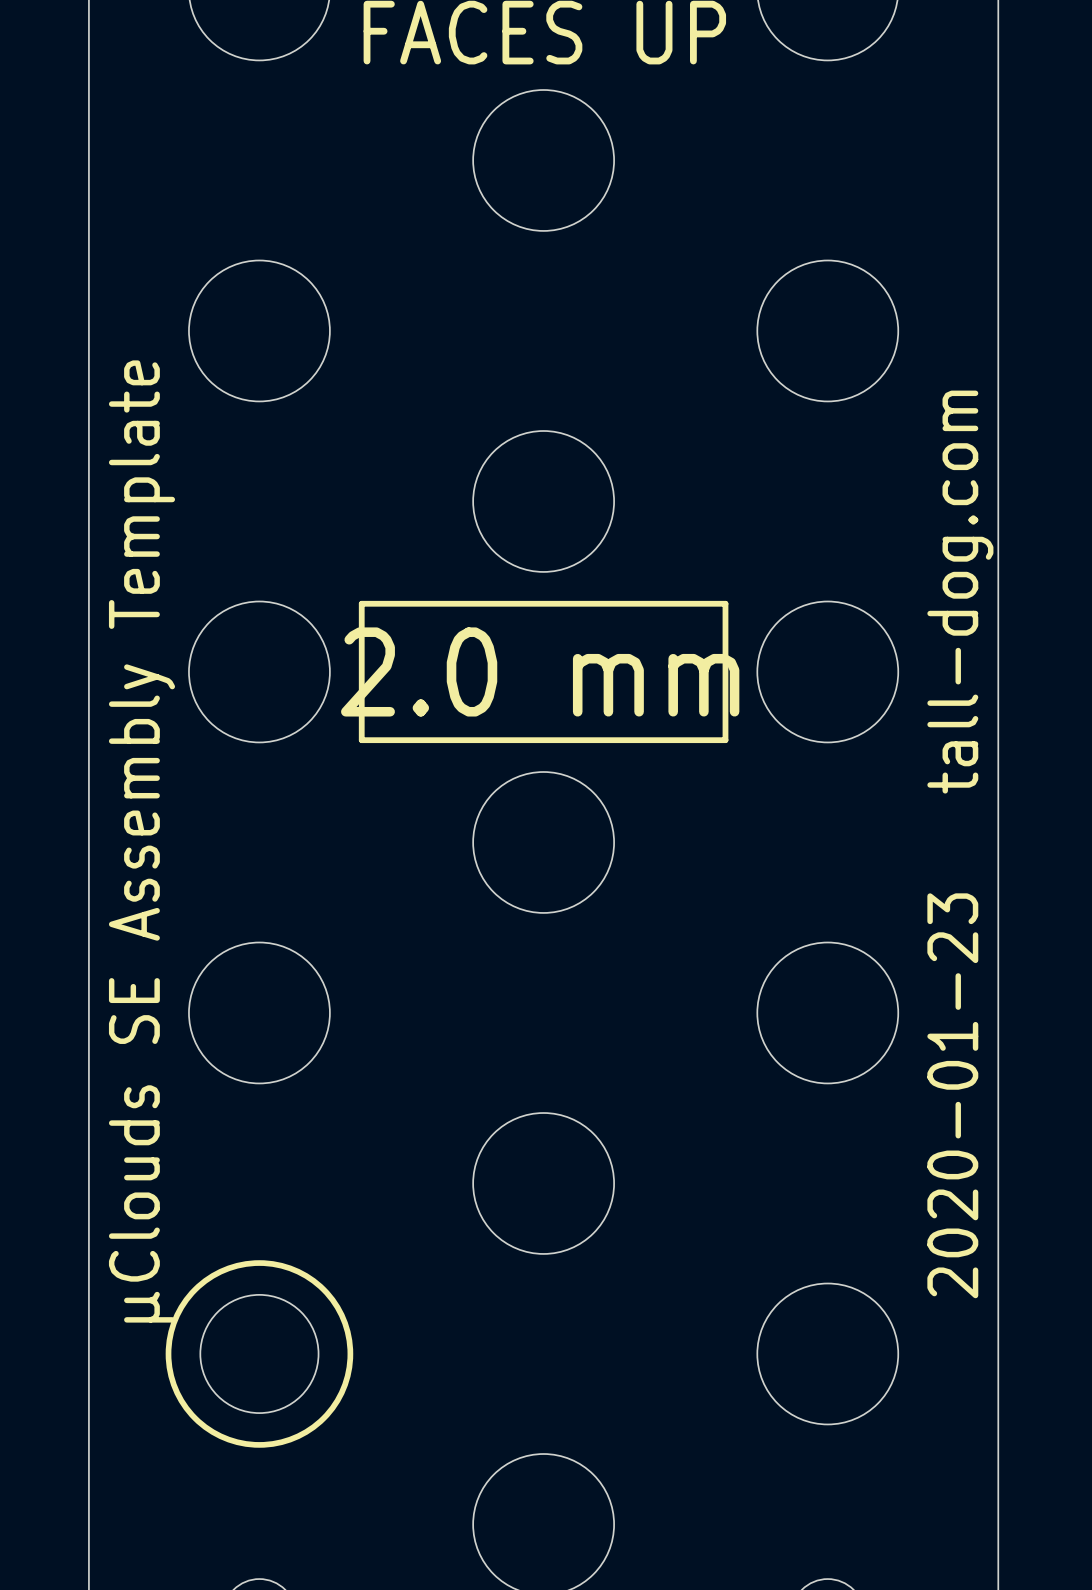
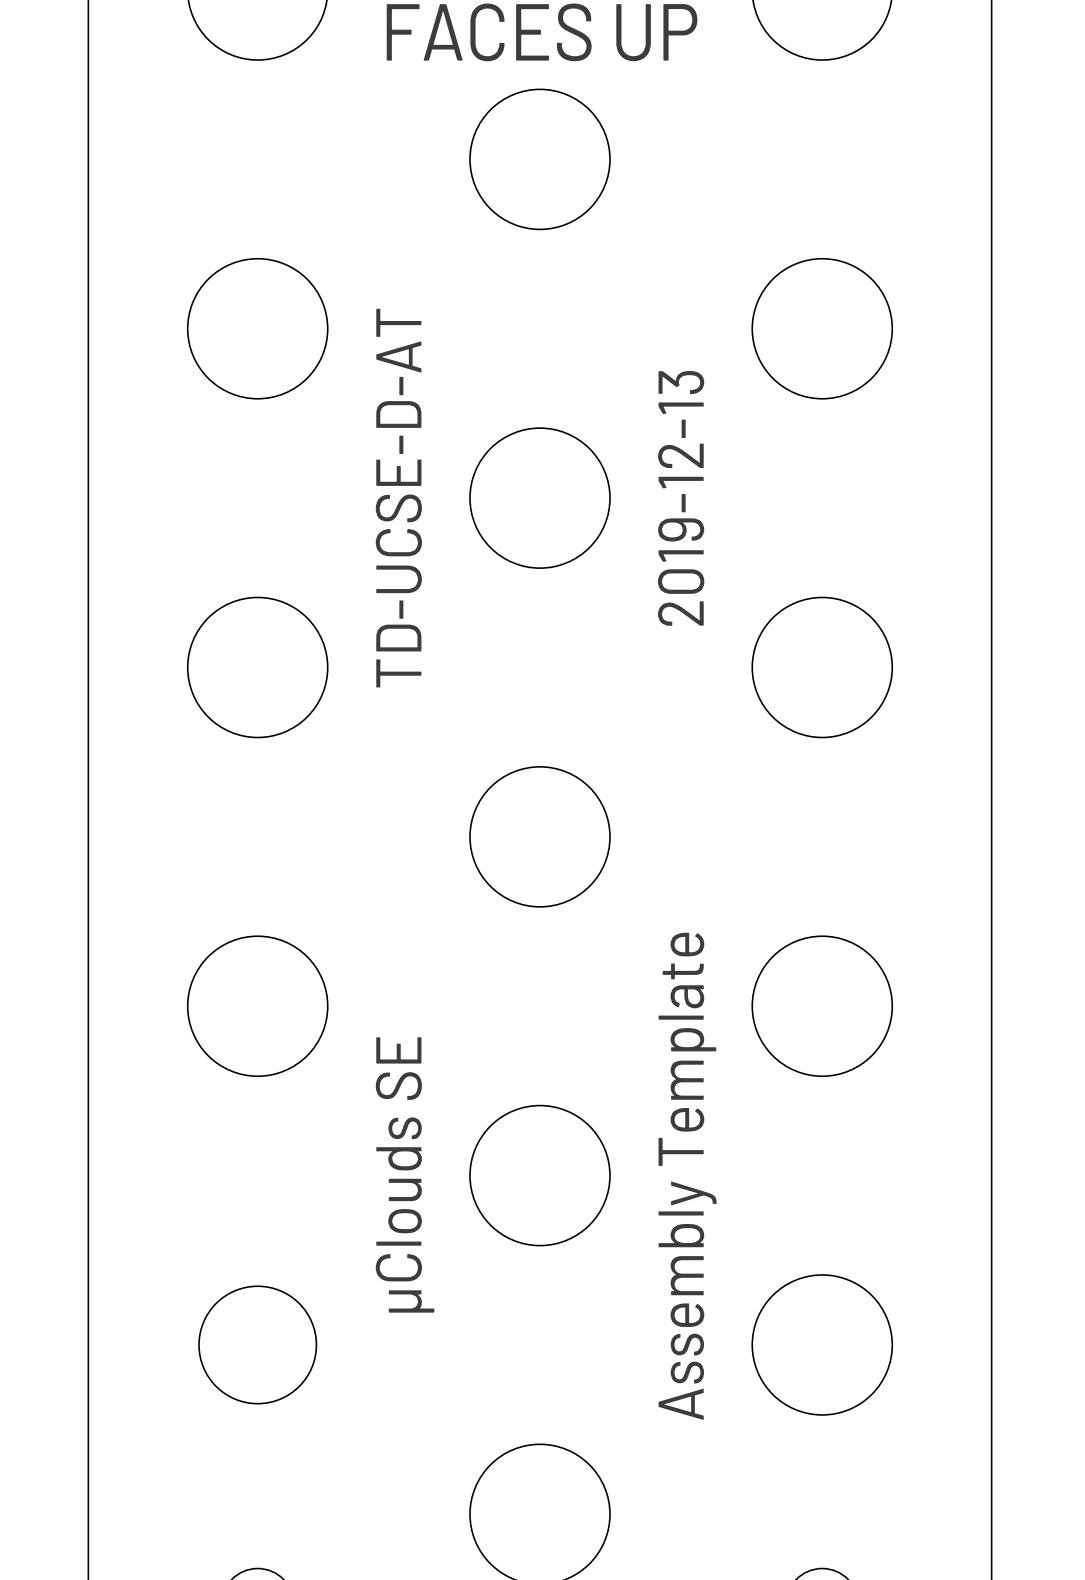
text: none -> TD-UCSE-D-AT (398, 498)
text: none -> 2019-12-13 (681, 498)
line: (361, 603) (725, 603) (725, 740) (361, 740) (361, 603) -> none
text: 2.0 mm (540, 671) -> none
text: µClouds SE Assembly Template (141, 841) -> none
text: 2020-01-23 tall-dog.com (960, 844) -> none
text: none -> µClouds SE (405, 1174)
text: none -> Assembly Template (687, 1176)
drawing: [165, 1260, 354, 1448] -> none

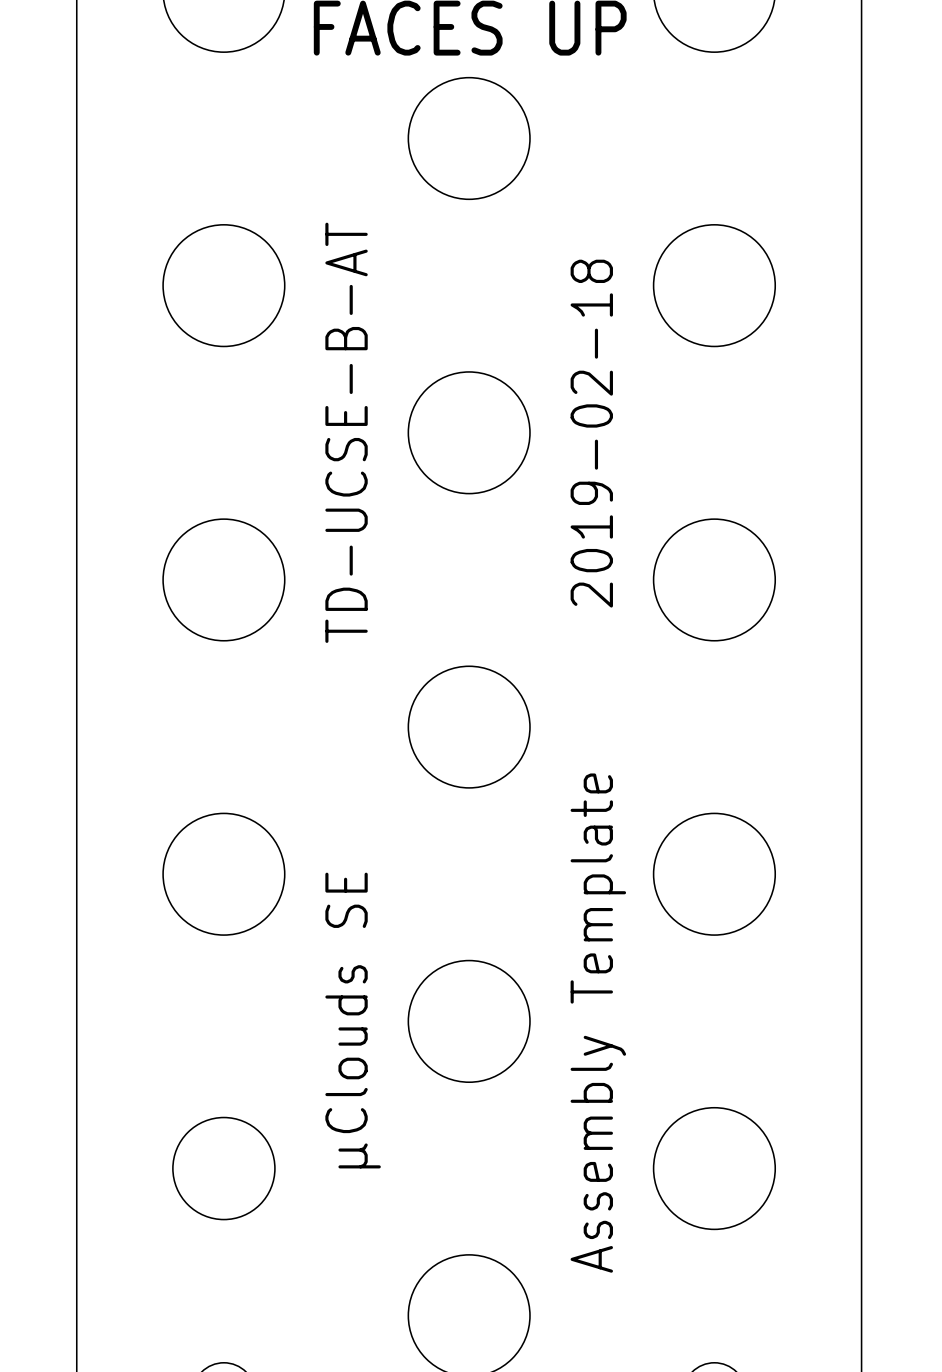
text: TD-UCSE-D-AT (398, 498) -> TD-UCSE-B-AT (346, 432)
text: 2019-12-13 (681, 498) -> 2019-02-18 (591, 433)

